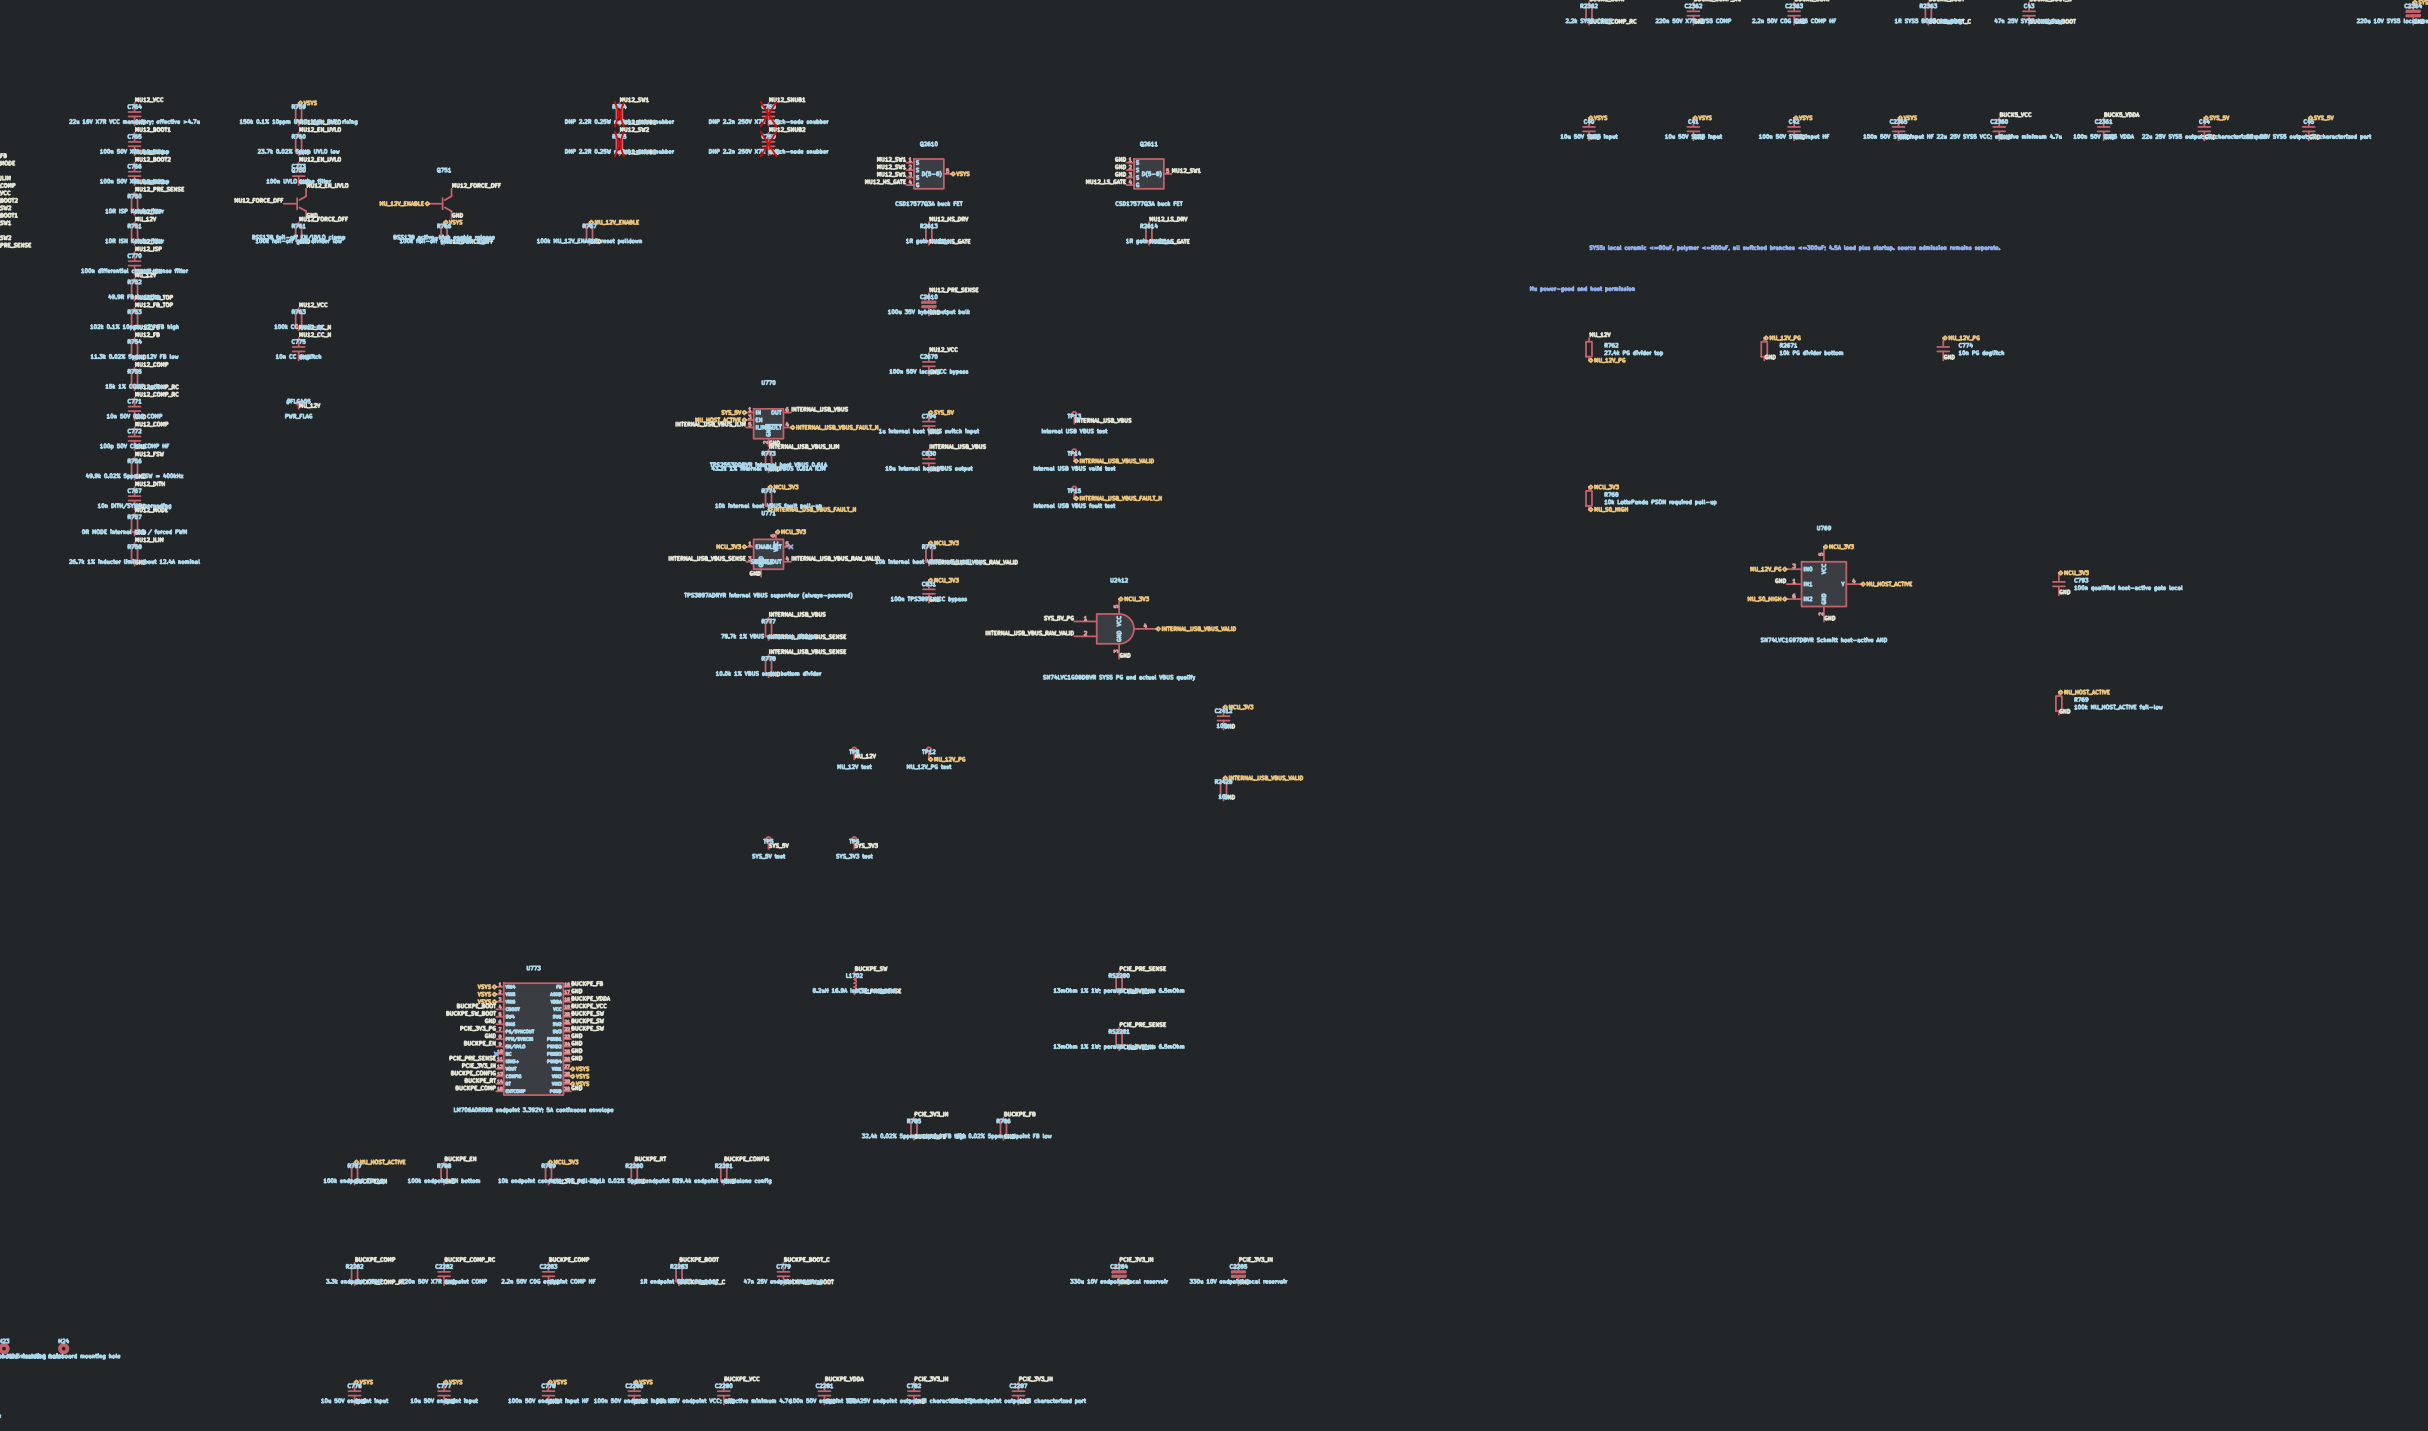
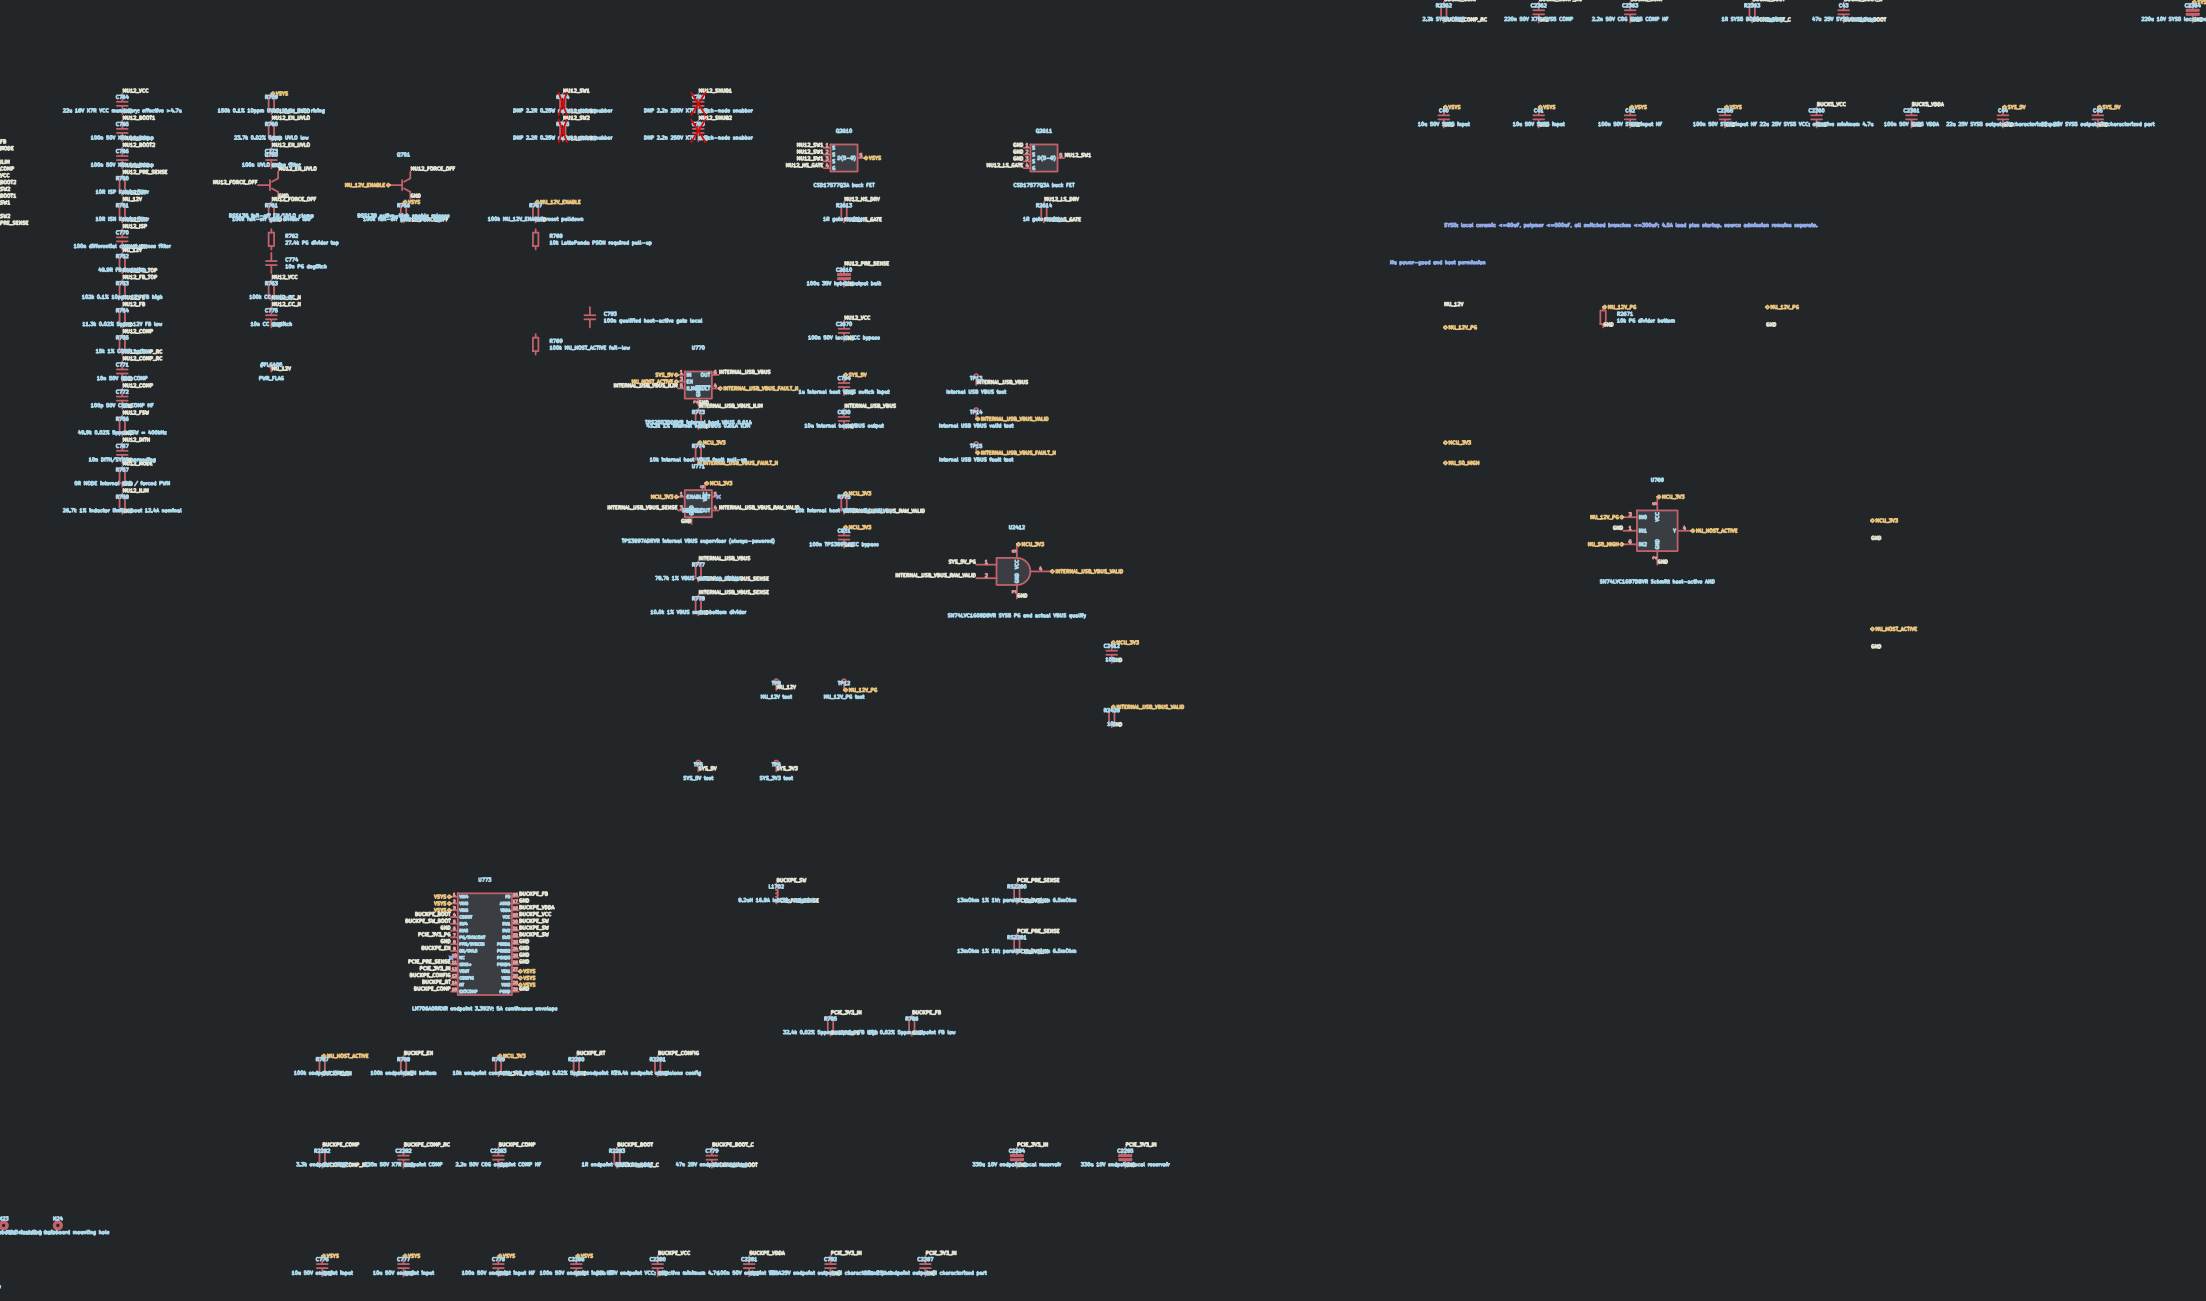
part position: (1588, 349) -> (271, 239)
part position: (1943, 349) -> (271, 263)
part position: (1588, 498) -> (535, 239)
part position: (2058, 584) -> (589, 317)
part position: (2058, 703) -> (535, 344)

